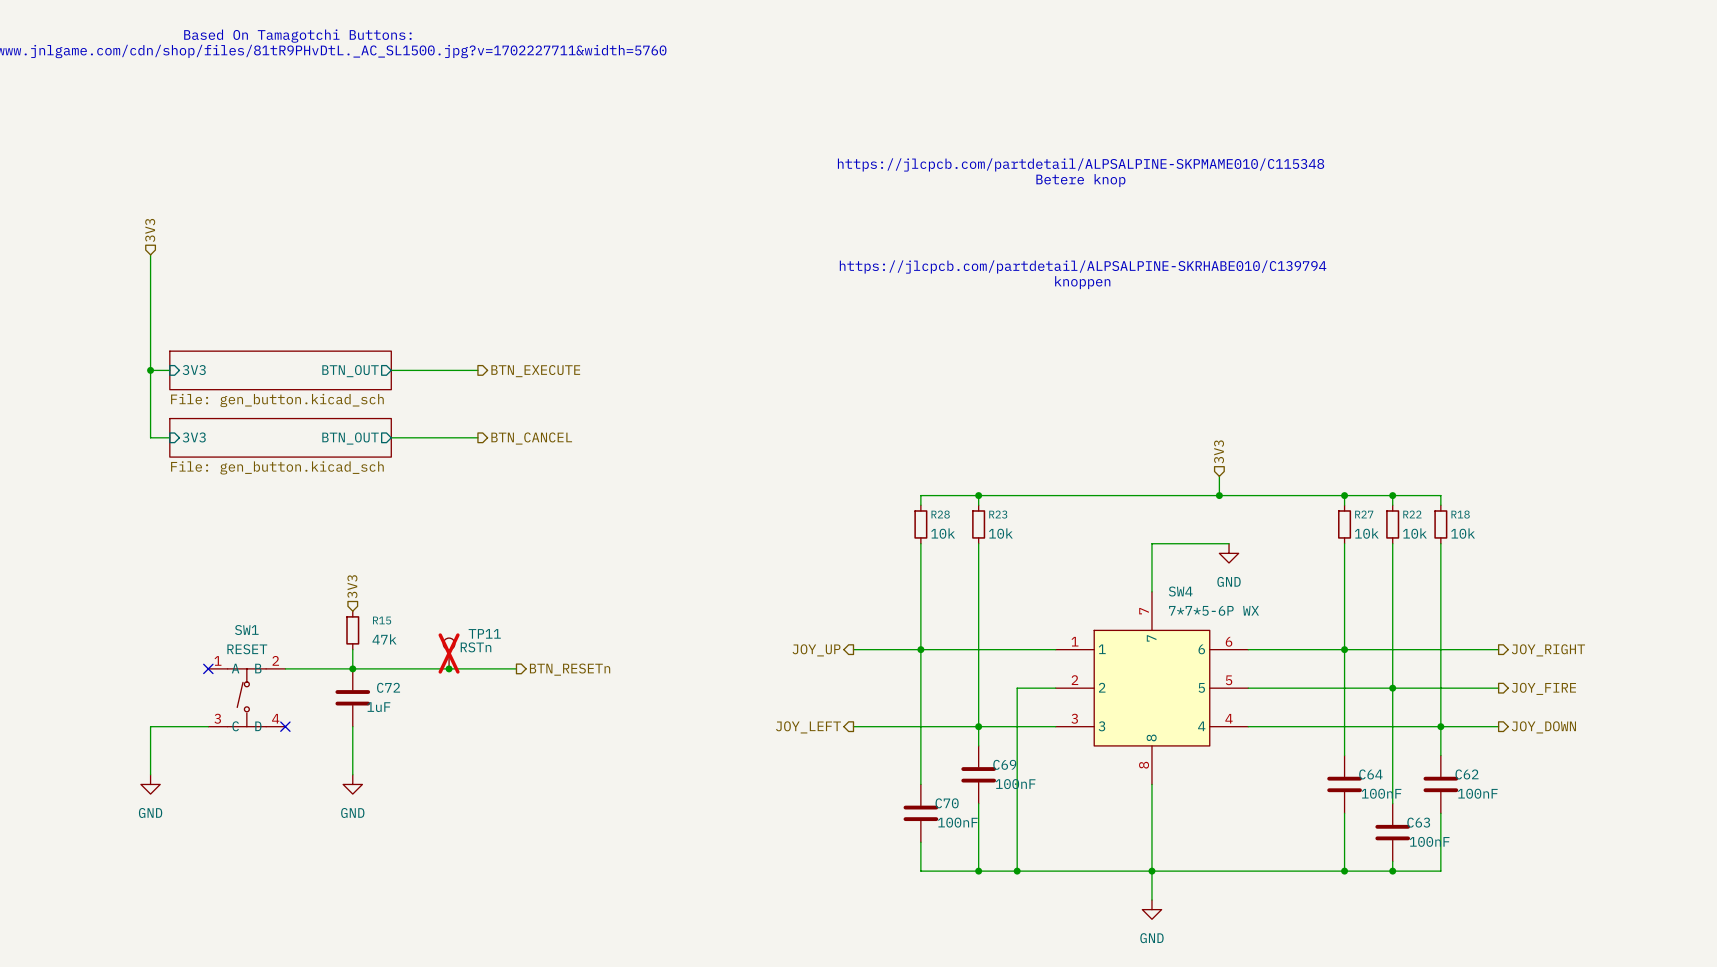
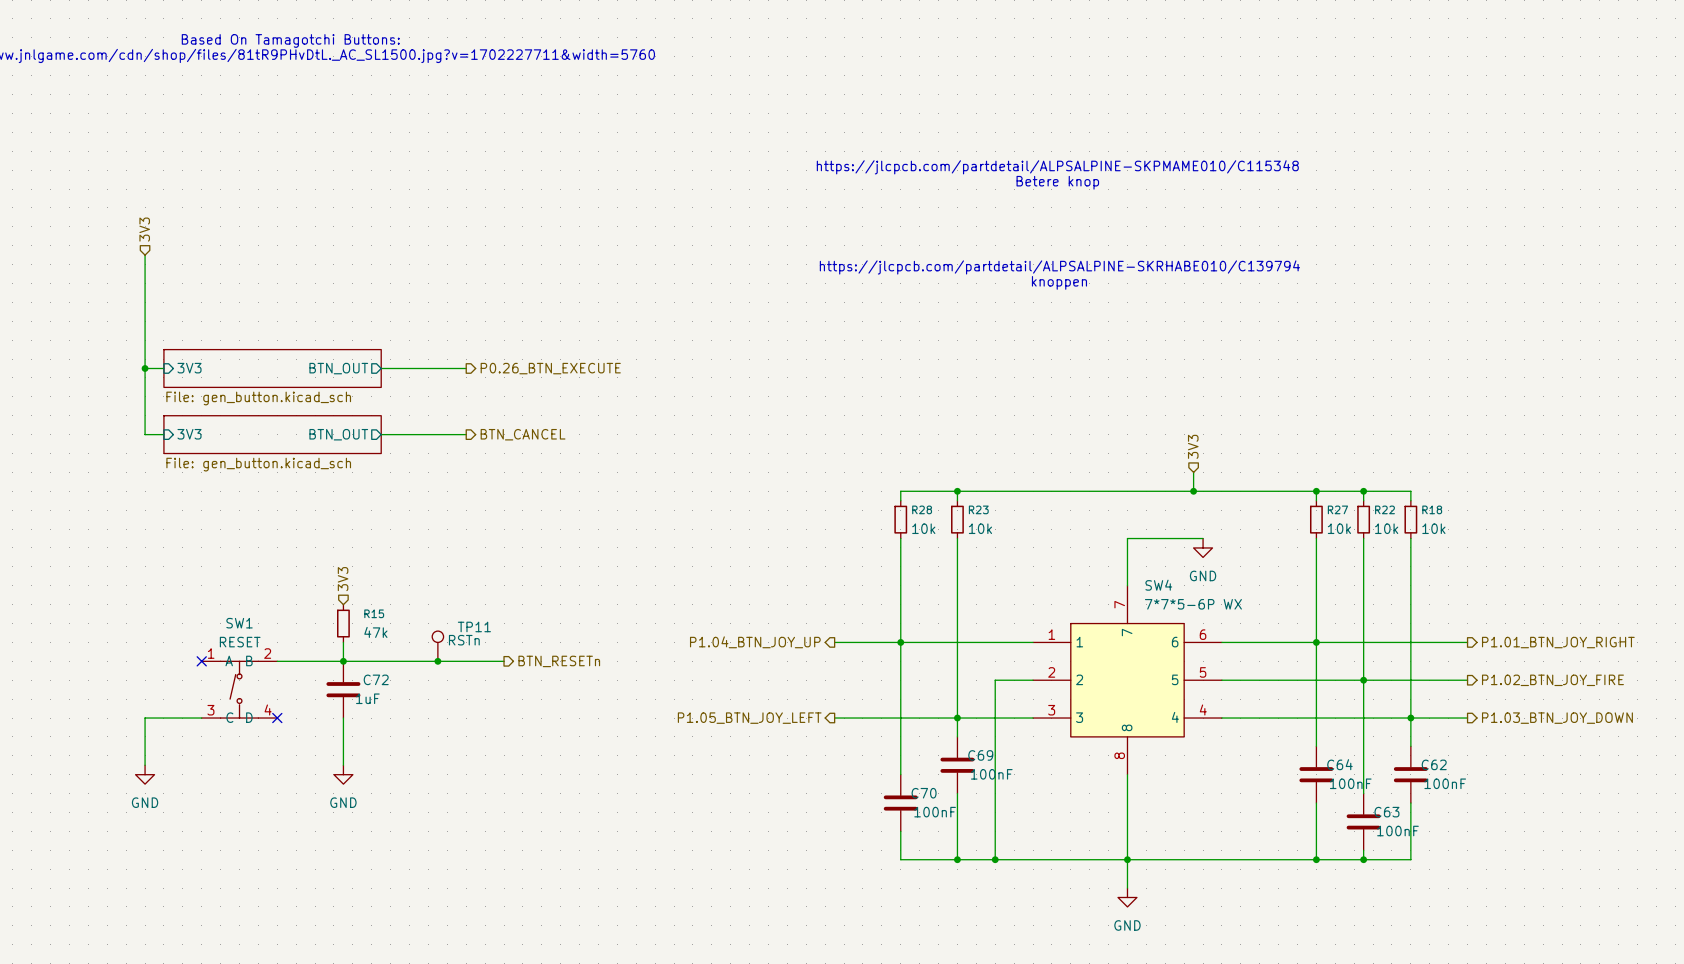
hierarchical label: BTN_EXECUTE (535, 371) -> P0.26_BTN_EXECUTE (550, 368)
hierarchical label: JOY_UP (816, 650) -> P1.04_BTN_JOY_UP (755, 642)
hierarchical label: JOY_RIGHT (1548, 650) -> P1.01_BTN_JOY_RIGHT (1558, 642)
TP11 do-not-place cross: (449, 653) -> none
hierarchical label: JOY_FIRE (1543, 688) -> P1.02_BTN_JOY_FIRE (1552, 680)
hierarchical label: JOY_LEFT (808, 727) -> P1.05_BTN_JOY_LEFT (749, 718)
hierarchical label: JOY_DOWN (1543, 727) -> P1.03_BTN_JOY_DOWN (1557, 718)

